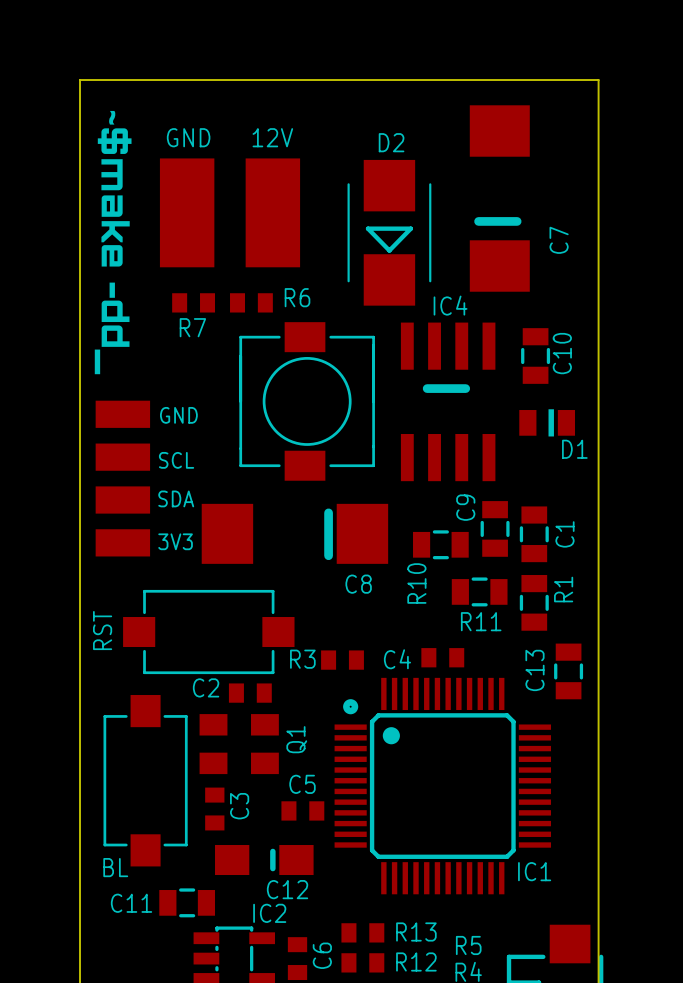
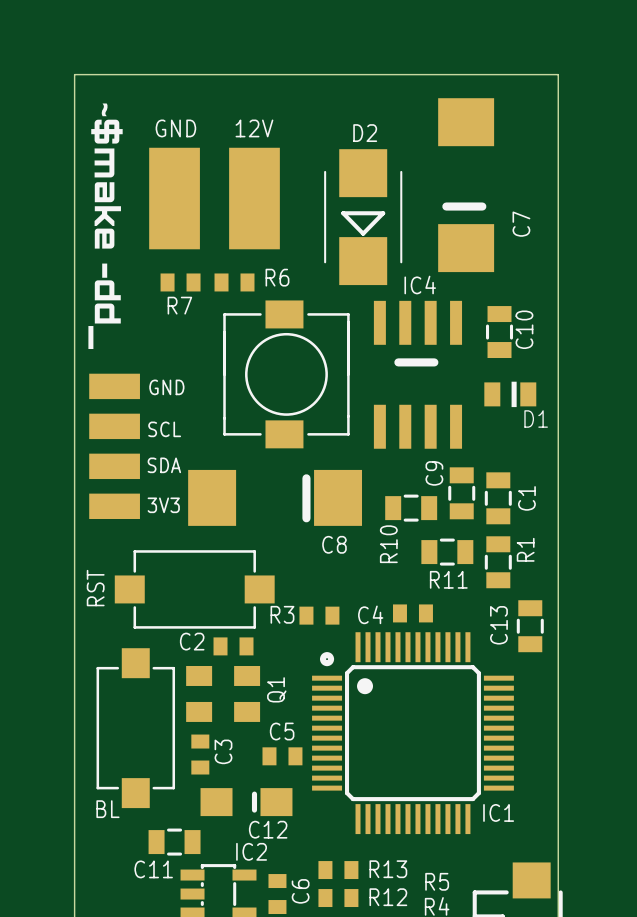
C11 name position: C11 (131, 903) -> C11 (153, 869)

